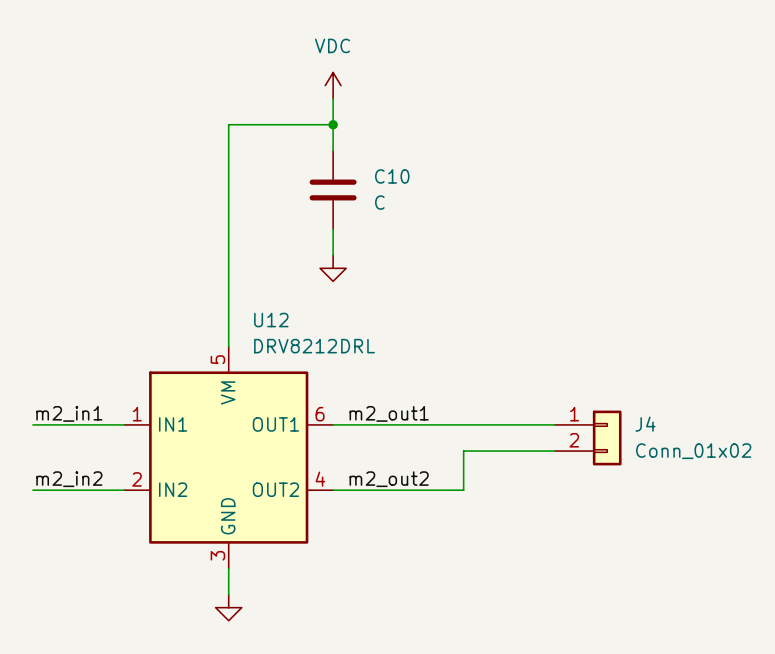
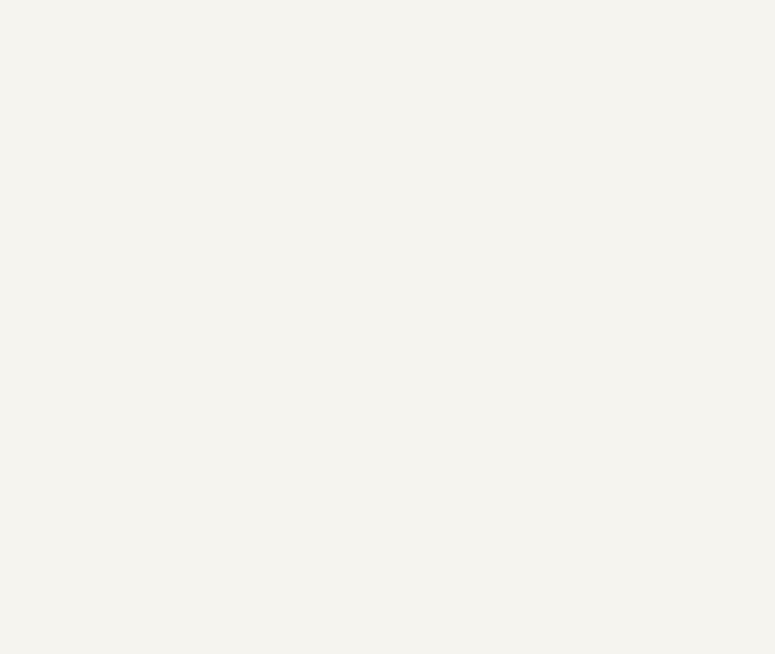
power symbol: VDC (333, 85) -> none
wire: (333, 98) (333, 150) -> none
wire: (333, 124) (228, 124) (228, 346) -> none
junction: (333, 124) -> none
C10: C (333, 190) -> none
wire: (333, 229) (333, 255) -> none
power symbol: (333, 268) -> none
label: m2_in1 (69, 413) -> none
label: m2_out1 (389, 413) -> none
wire: (32, 424) (124, 424) -> none
wire: (333, 424) (555, 424) -> none
J4: Conn_01x02 (588, 437) -> none
wire: (555, 451) (463, 451) (463, 490) (333, 490) -> none
U12: DRV8212DRL (228, 457) -> none
label: m2_in2 (69, 479) -> none
label: m2_out2 (389, 479) -> none
wire: (32, 490) (124, 490) -> none
wire: (228, 568) (228, 594) -> none
power symbol: (228, 607) -> none

